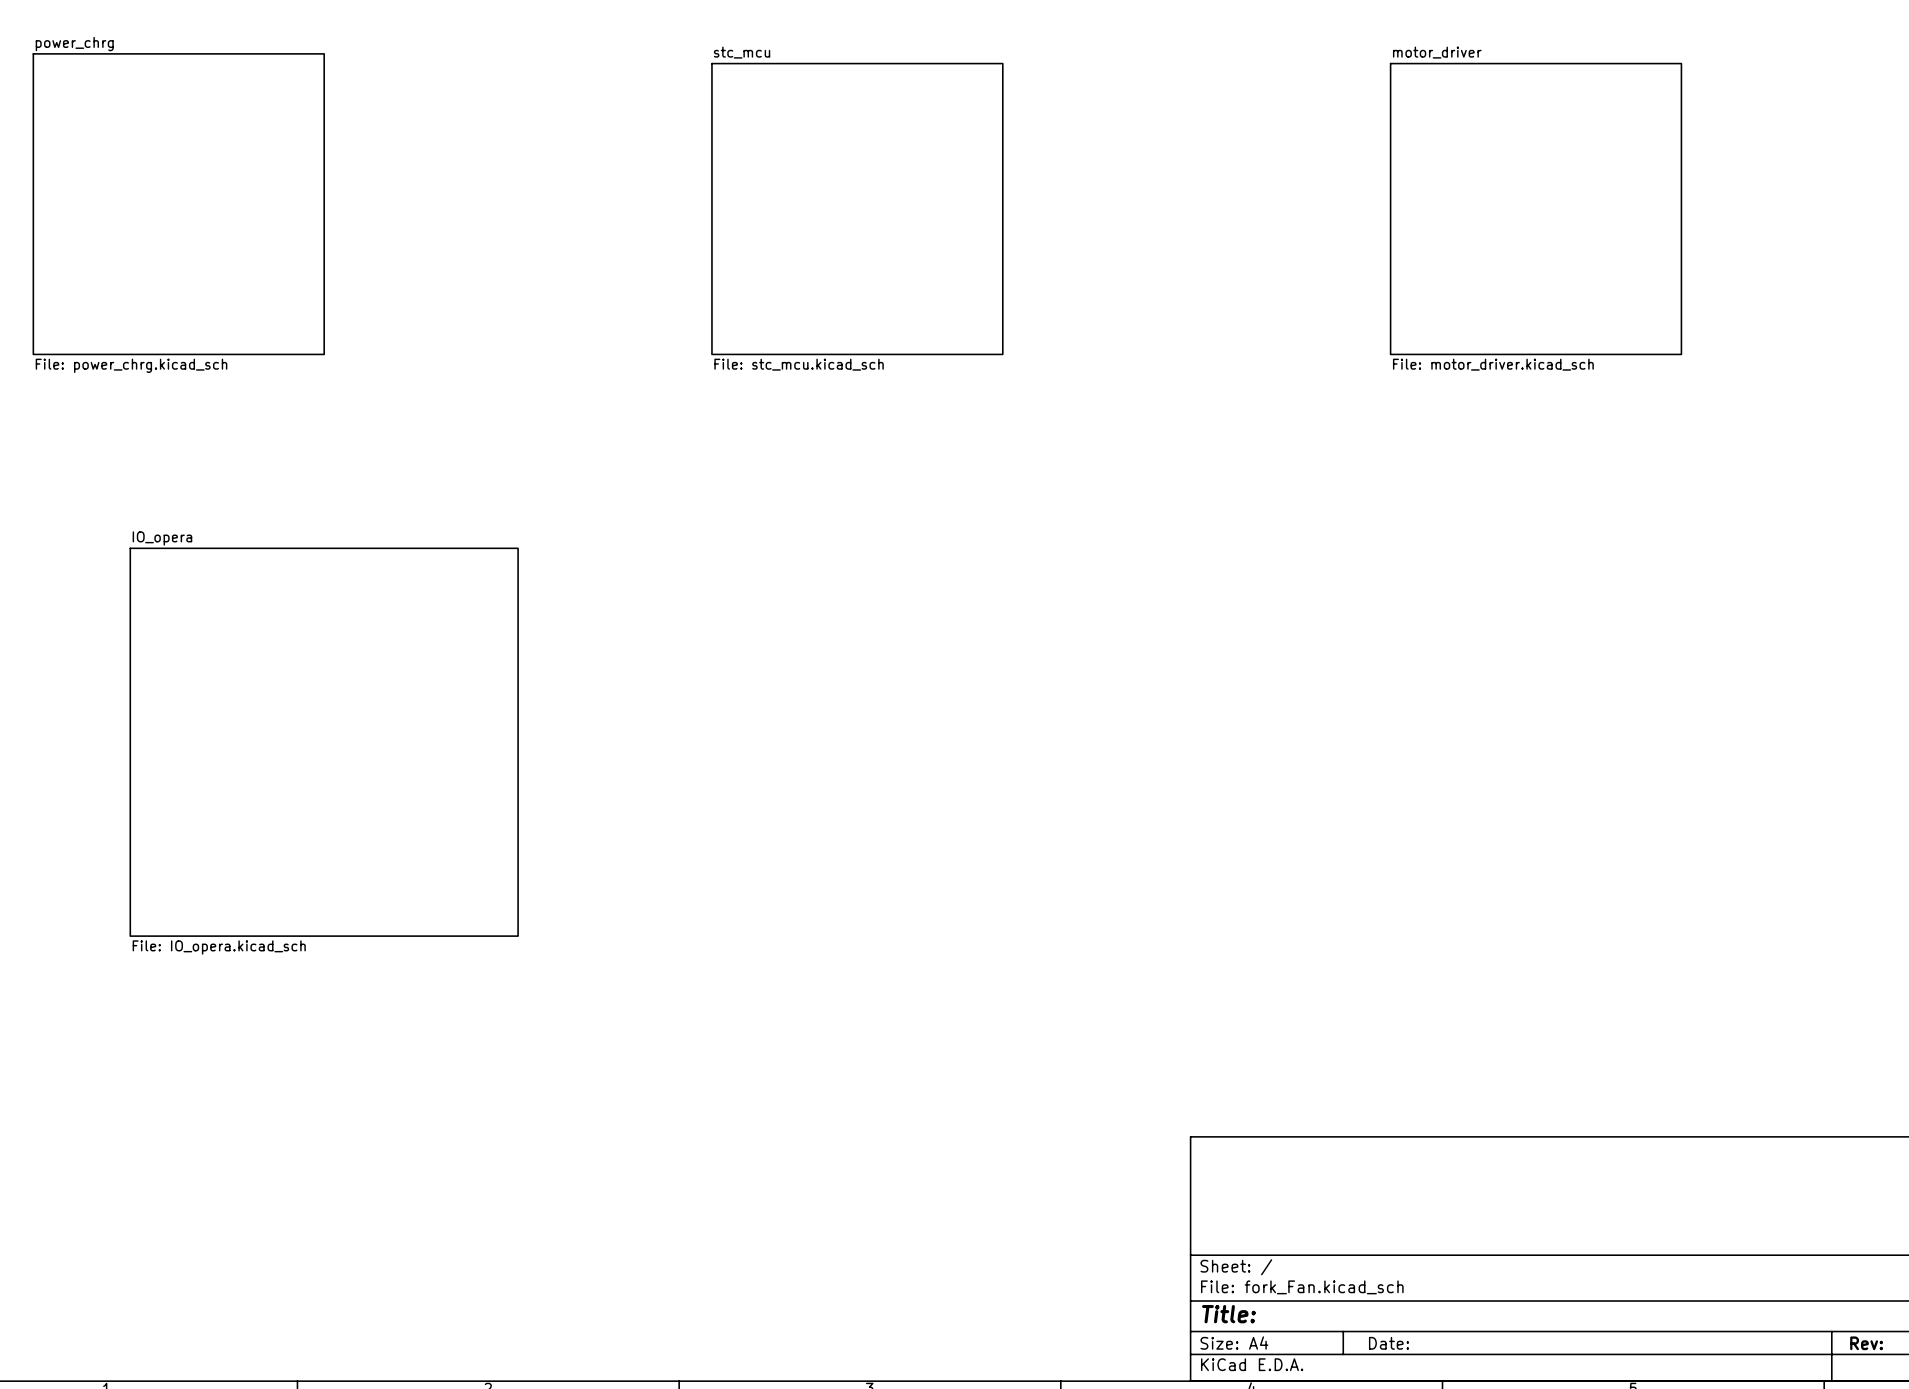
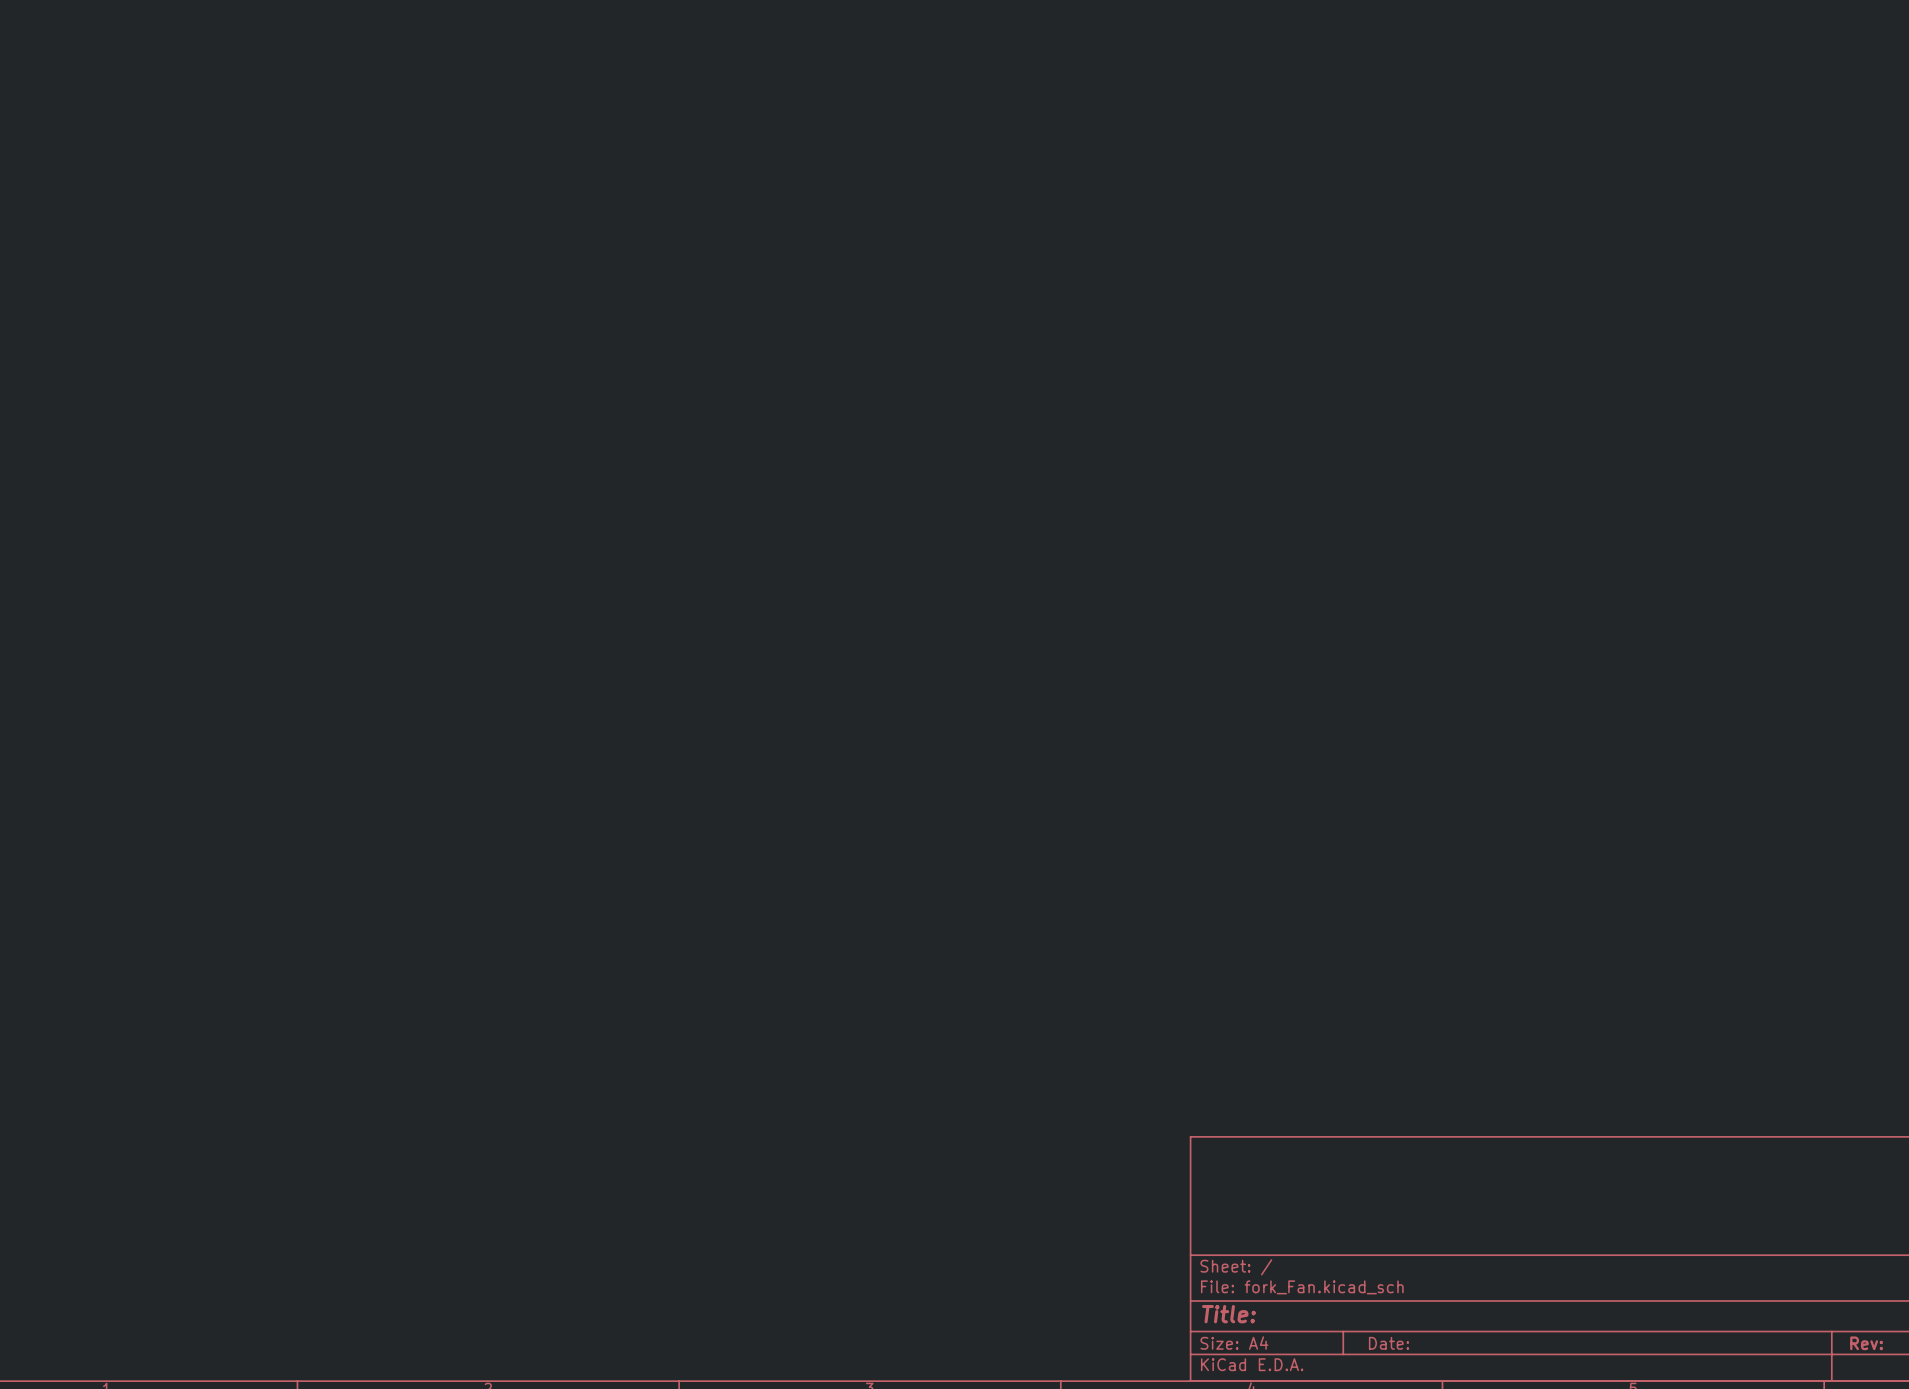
sheet power_chrg: File: power_chrg.kicad_sch (178, 204) -> none
sheet stc_mcu: File: stc_mcu.kicad_sch (857, 209) -> none
sheet motor_driver: File: motor_driver.kicad_sch (1536, 209) -> none
sheet IO_opera: File: IO_opera.kicad_sch (324, 742) -> none

